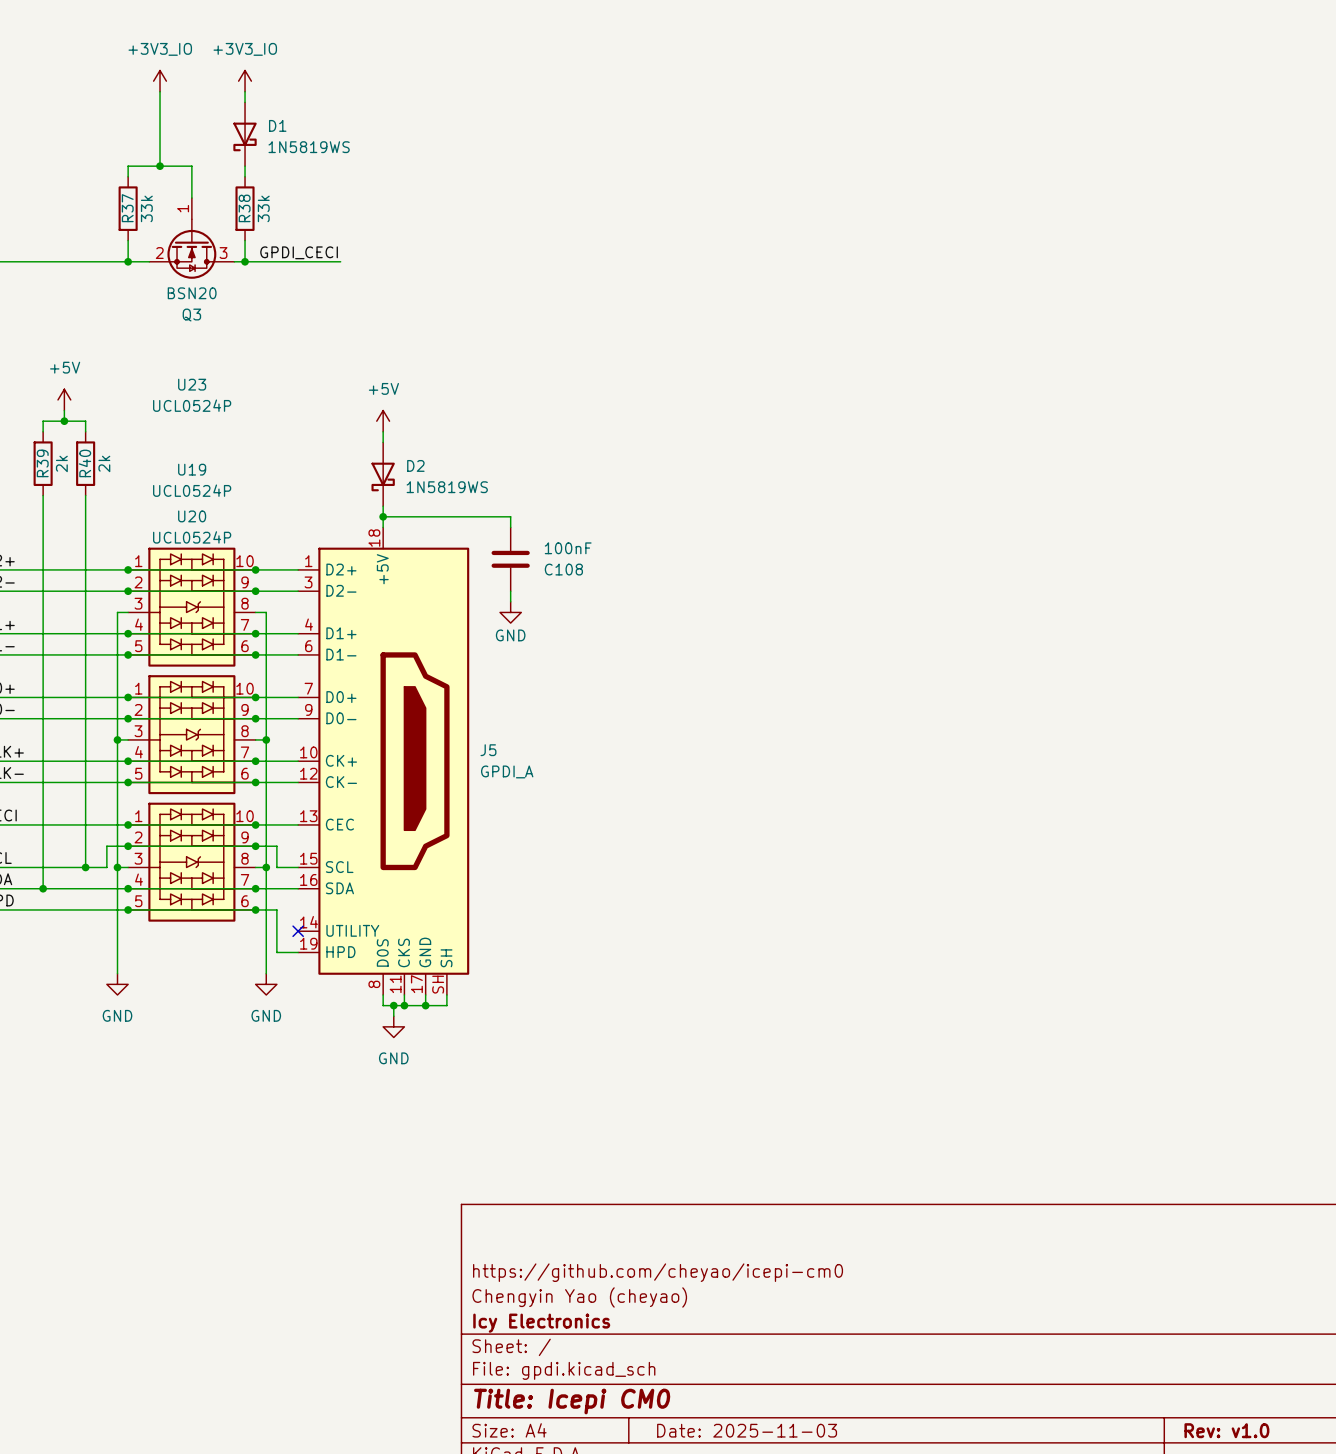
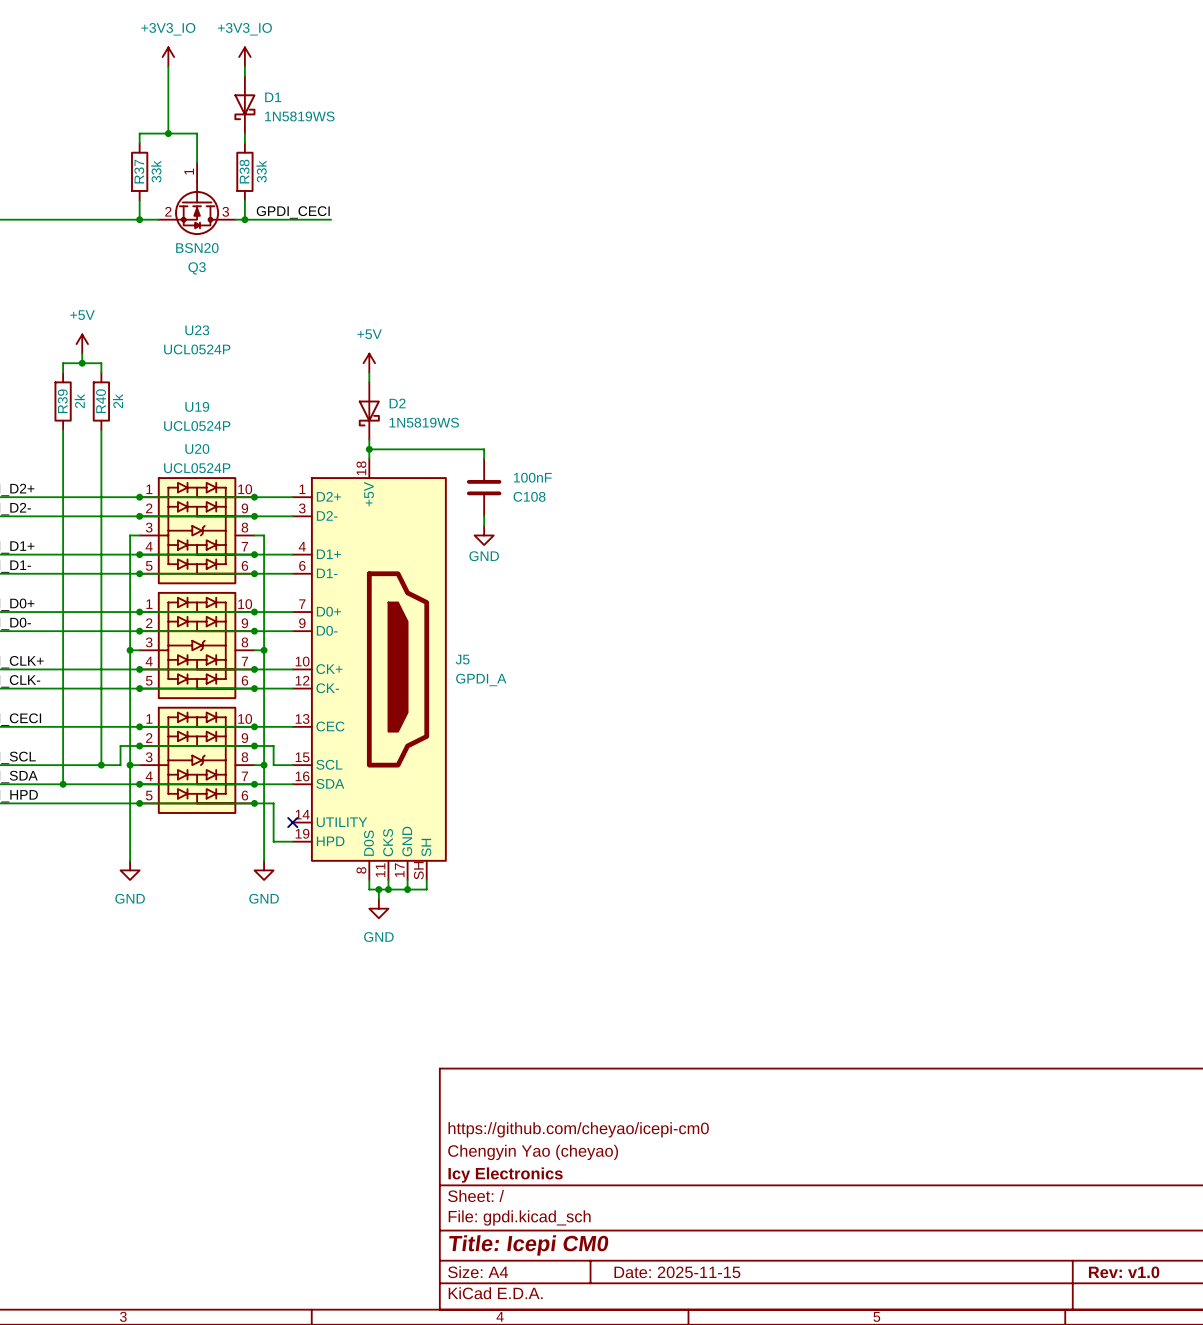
title block: Date: 2025-11-03 (747, 1430) -> Date: 2025-11-15 (677, 1272)

